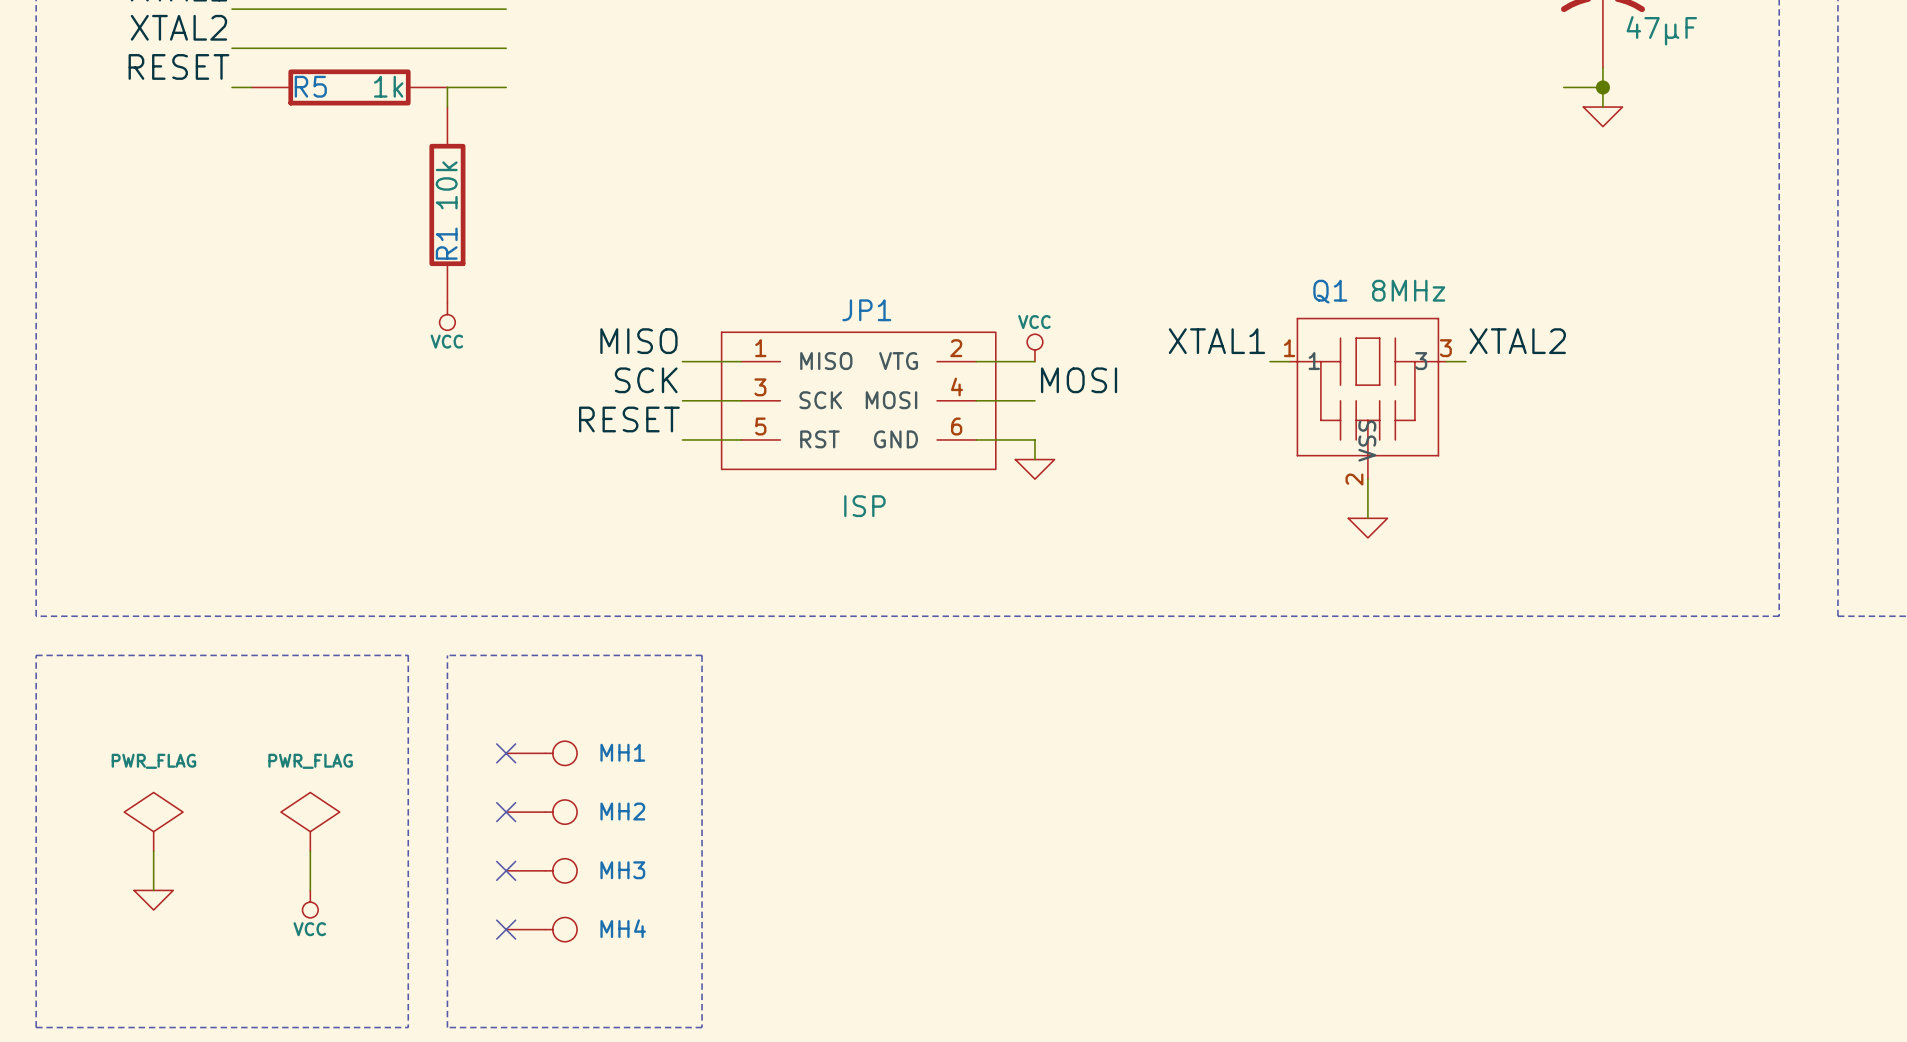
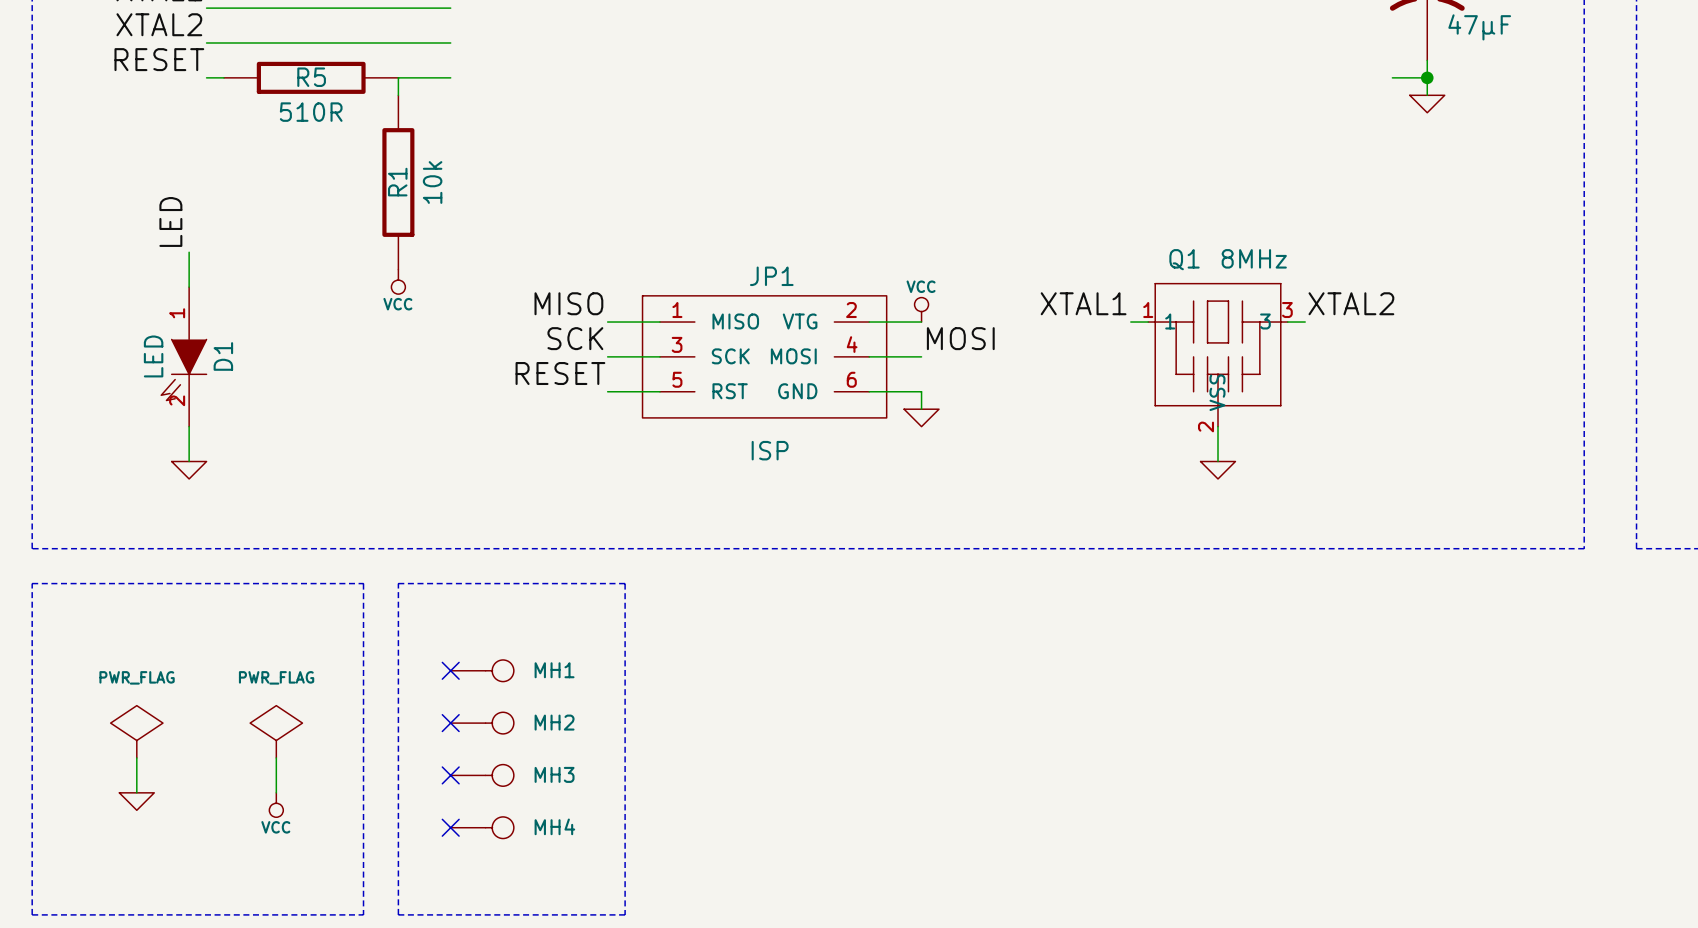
R5 name position: R5 (310, 86) -> R5 (311, 77)
R5 value: 1k (388, 86) -> 510R (311, 112)
R1 value position: 10k (446, 185) -> 10k (432, 182)
R1 name position: R1 (446, 243) -> R1 (397, 182)
label: none -> LED (170, 221)
wire: none -> (189, 252) (189, 287)
D1: none -> LED (183, 356)
wire: none -> (189, 426) (189, 461)
power symbol: none -> (189, 470)

